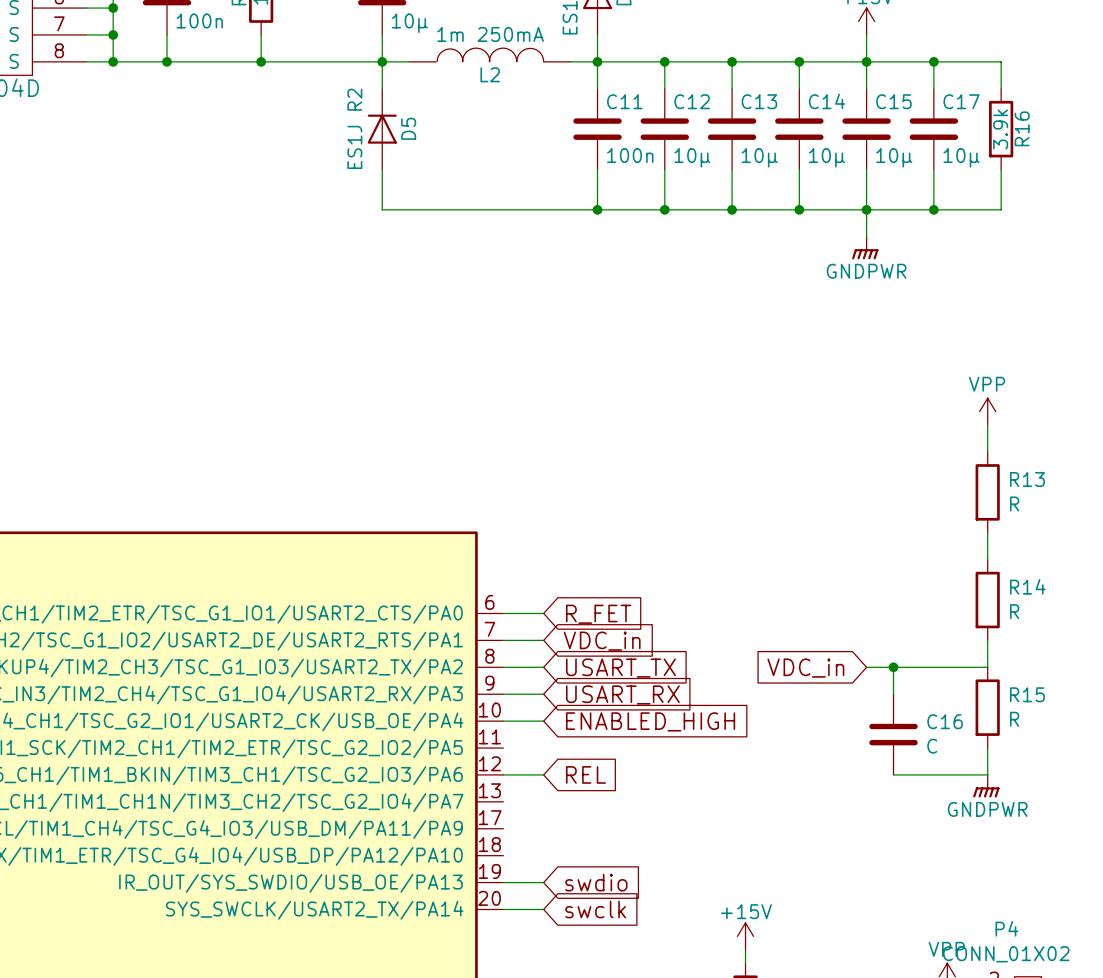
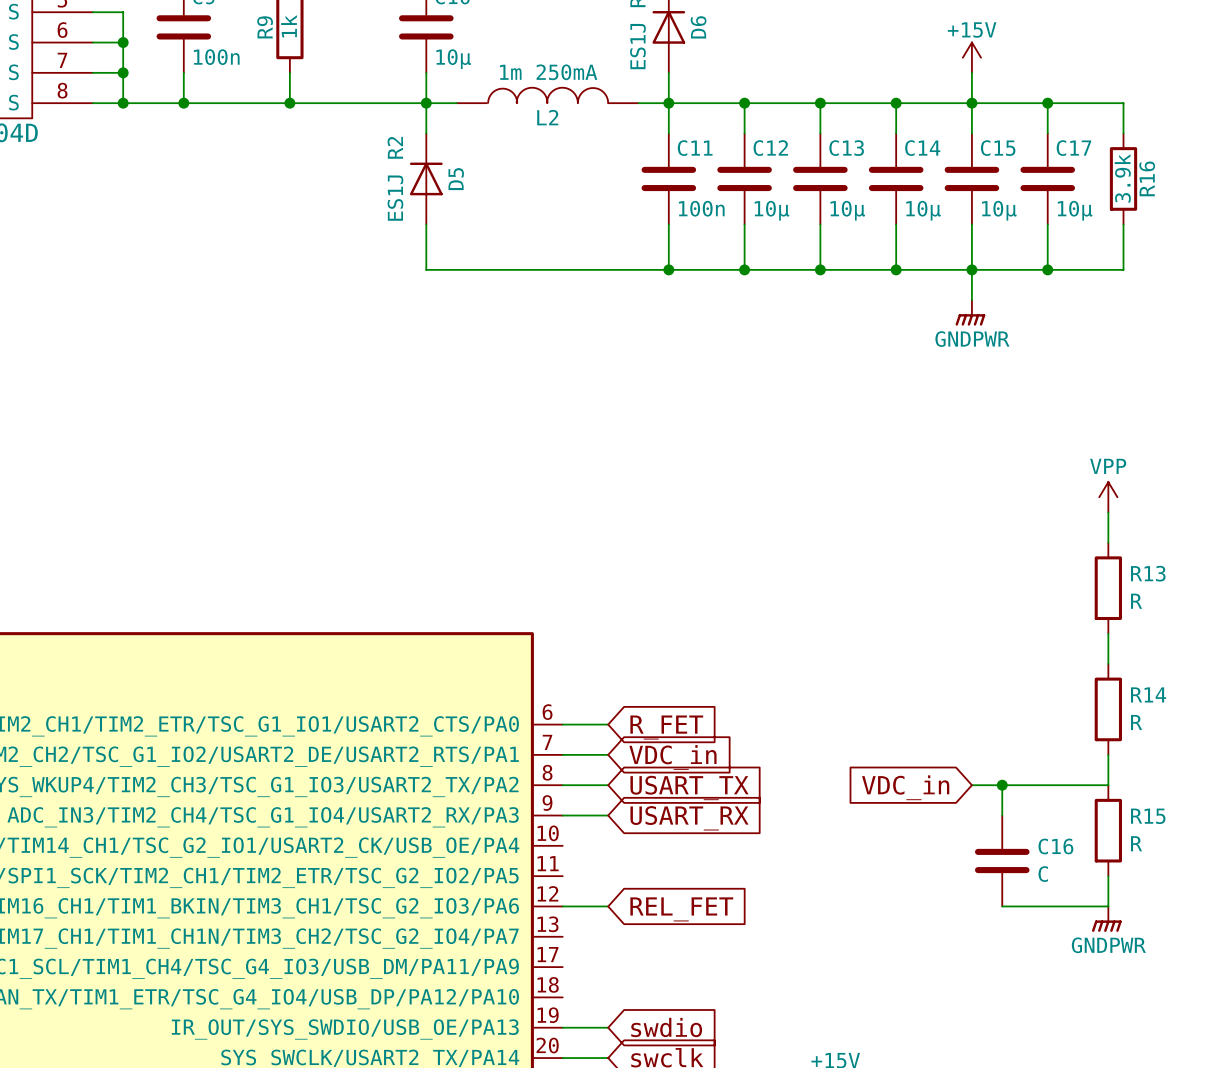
wire: (503, 721) (543, 721) -> none
global label: ENABLED_HIGH (650, 721) -> none
global label: REL (585, 774) -> REL_FET (681, 909)

